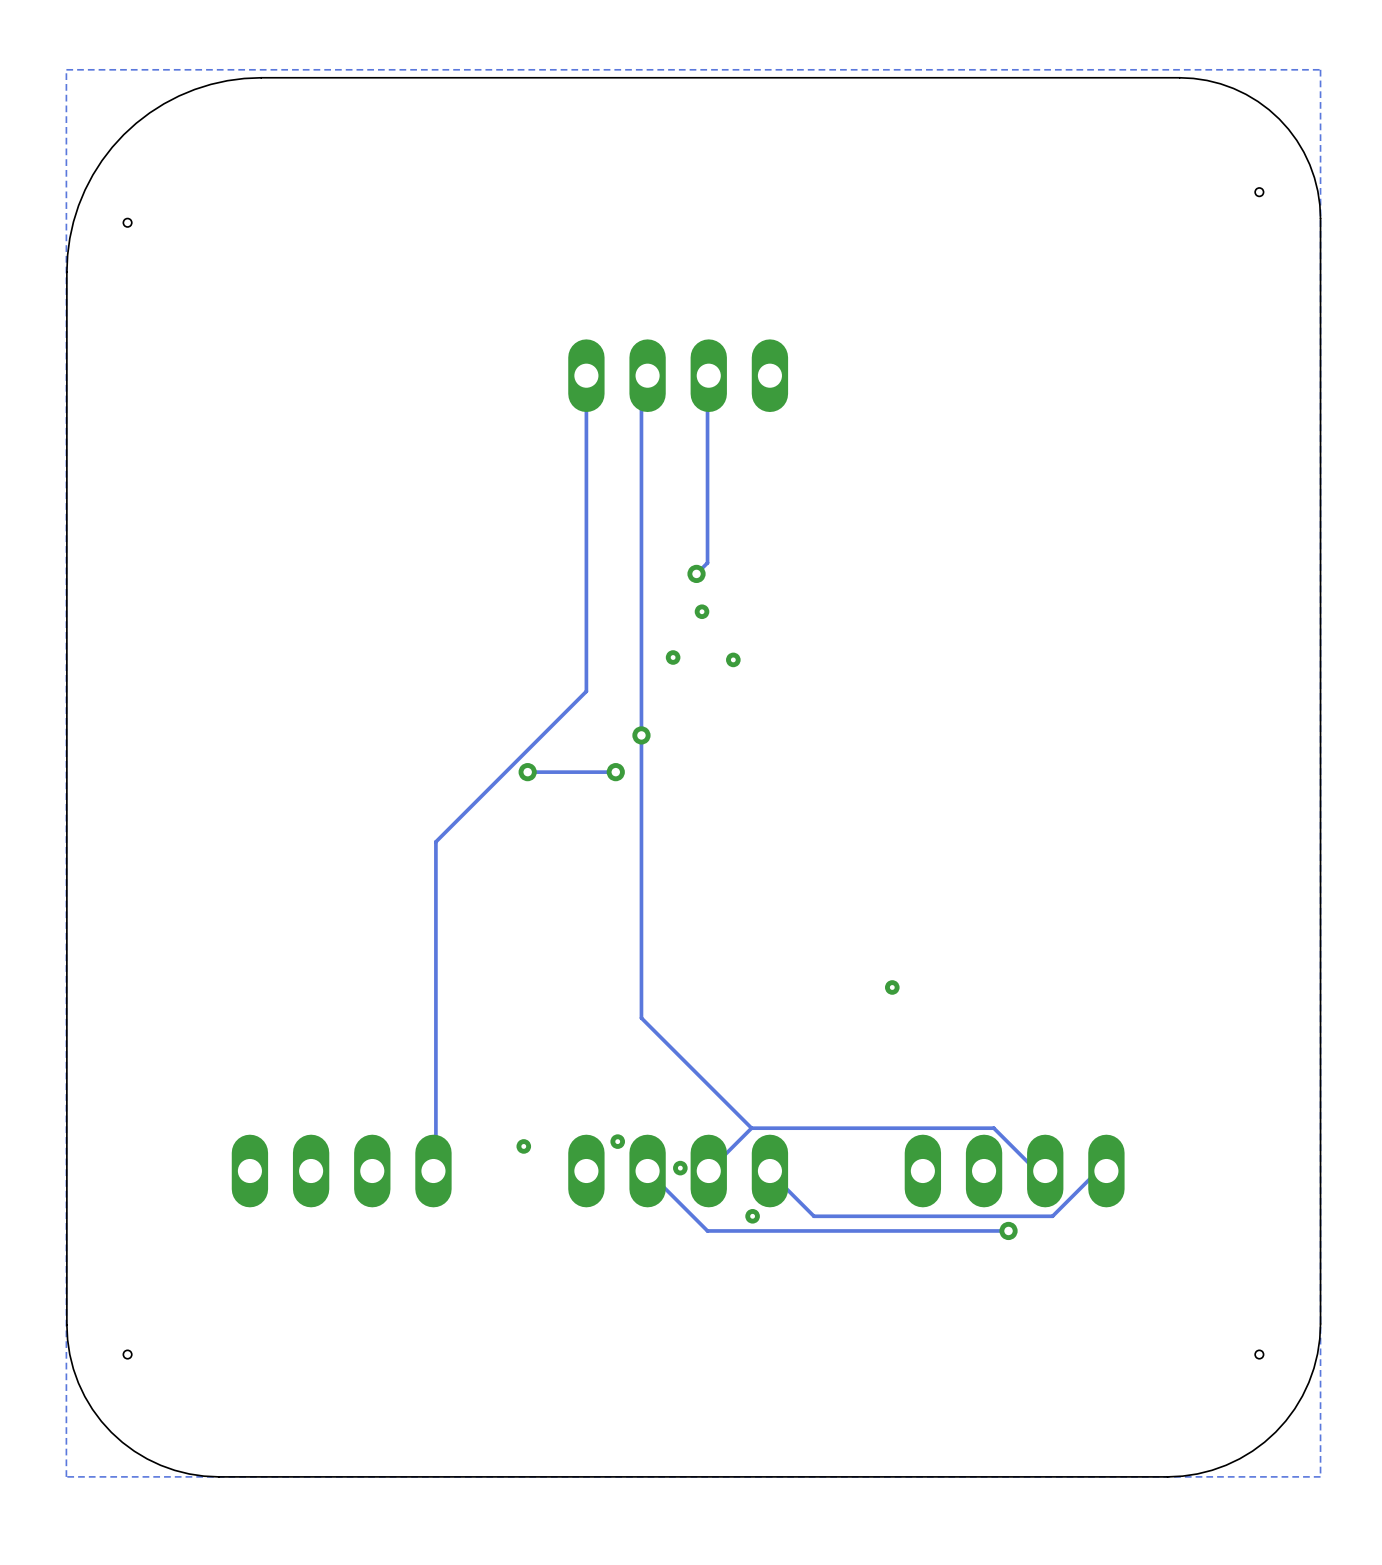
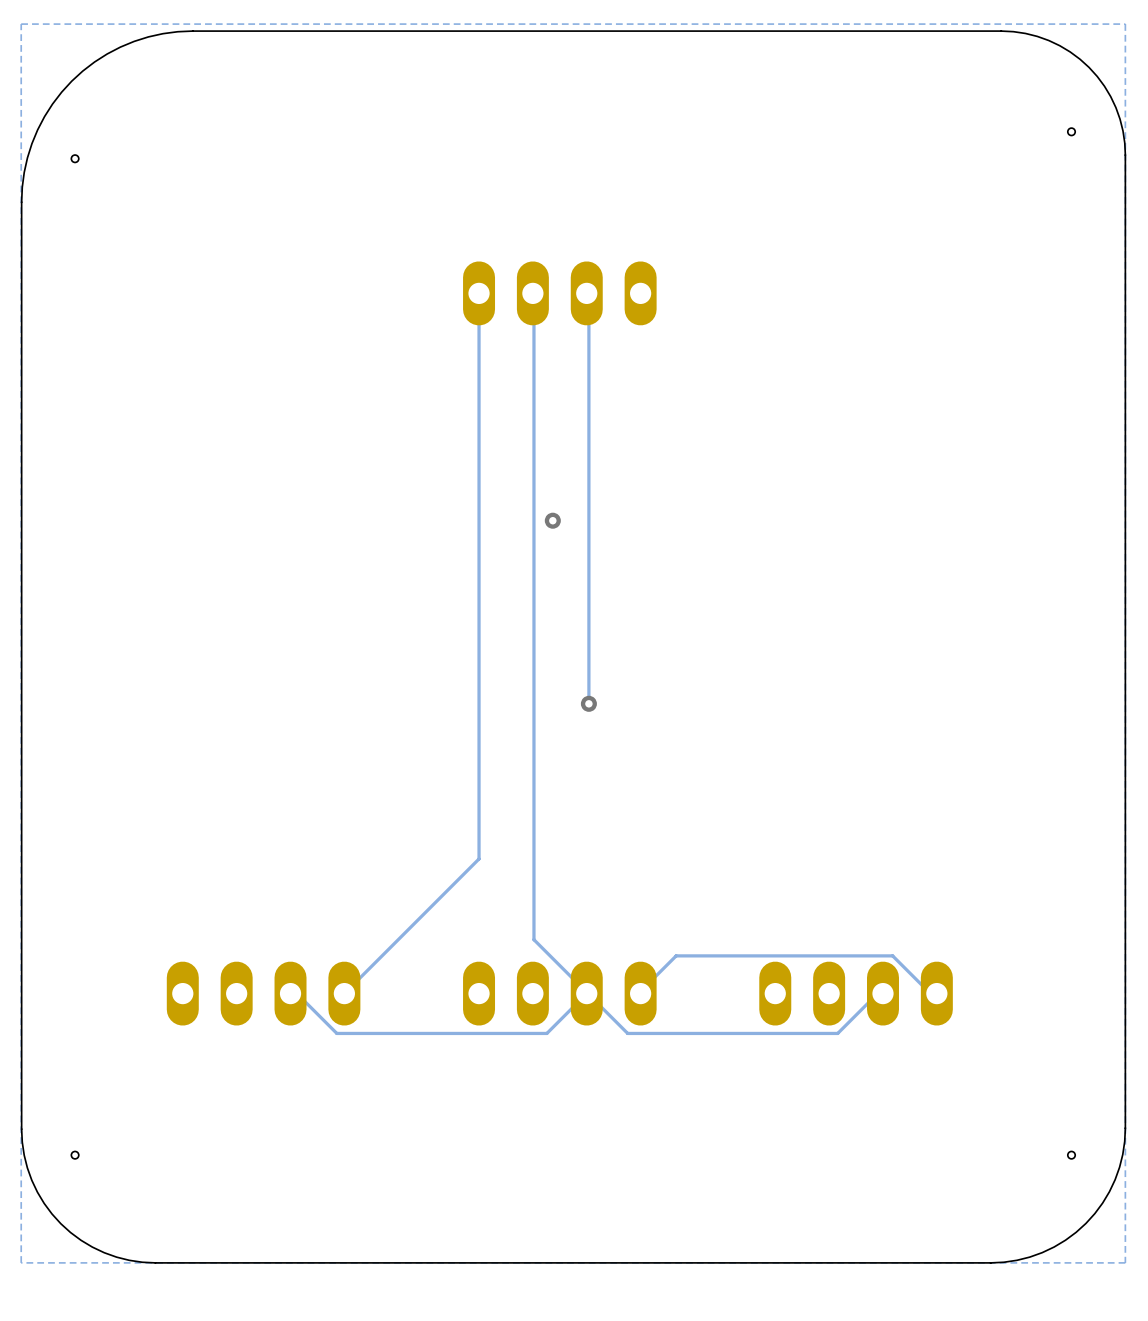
track: (647, 375) (641, 379) (641, 1018) (751, 1128) -> (532, 293) (533, 939) (586, 993)
track: (708, 375) (707, 562) (696, 573) -> (586, 293) (588, 293) (588, 703)
via: (696, 573) -> none
via: (702, 611) -> none
via: none -> (552, 520)
via: (673, 657) -> none
via: (733, 659) -> none
track: (586, 691) (435, 841) (435, 1168) -> (479, 571) (479, 858) (346, 991)
via: (641, 735) -> none
via: (527, 772) -> none
track: (615, 772) (527, 772) -> none
via: (615, 772) -> none
via: none -> (588, 703)
via: (892, 987) -> none
track: (751, 1128) (708, 1171) -> (290, 993) (298, 994) (336, 1033) (546, 1033) (586, 993)
track: (810, 1128) (751, 1128) -> (676, 955) (640, 993)
track: (993, 1128) (1034, 1168) (1045, 1168) (1045, 1171) -> (837, 955) (892, 955) (928, 991) (934, 991) (936, 993)
via: (617, 1141) -> none
via: (523, 1146) -> none
via: (680, 1168) -> none
track: (647, 1171) (707, 1230) (1008, 1230) -> none
track: (769, 1171) (813, 1216) -> (586, 993) (627, 1033) (679, 1033)
track: (1106, 1171) (1096, 1172) (1052, 1216) (993, 1216) -> (882, 993) (876, 994) (837, 1033)
via: (752, 1216) -> none
via: (1008, 1230) -> none

